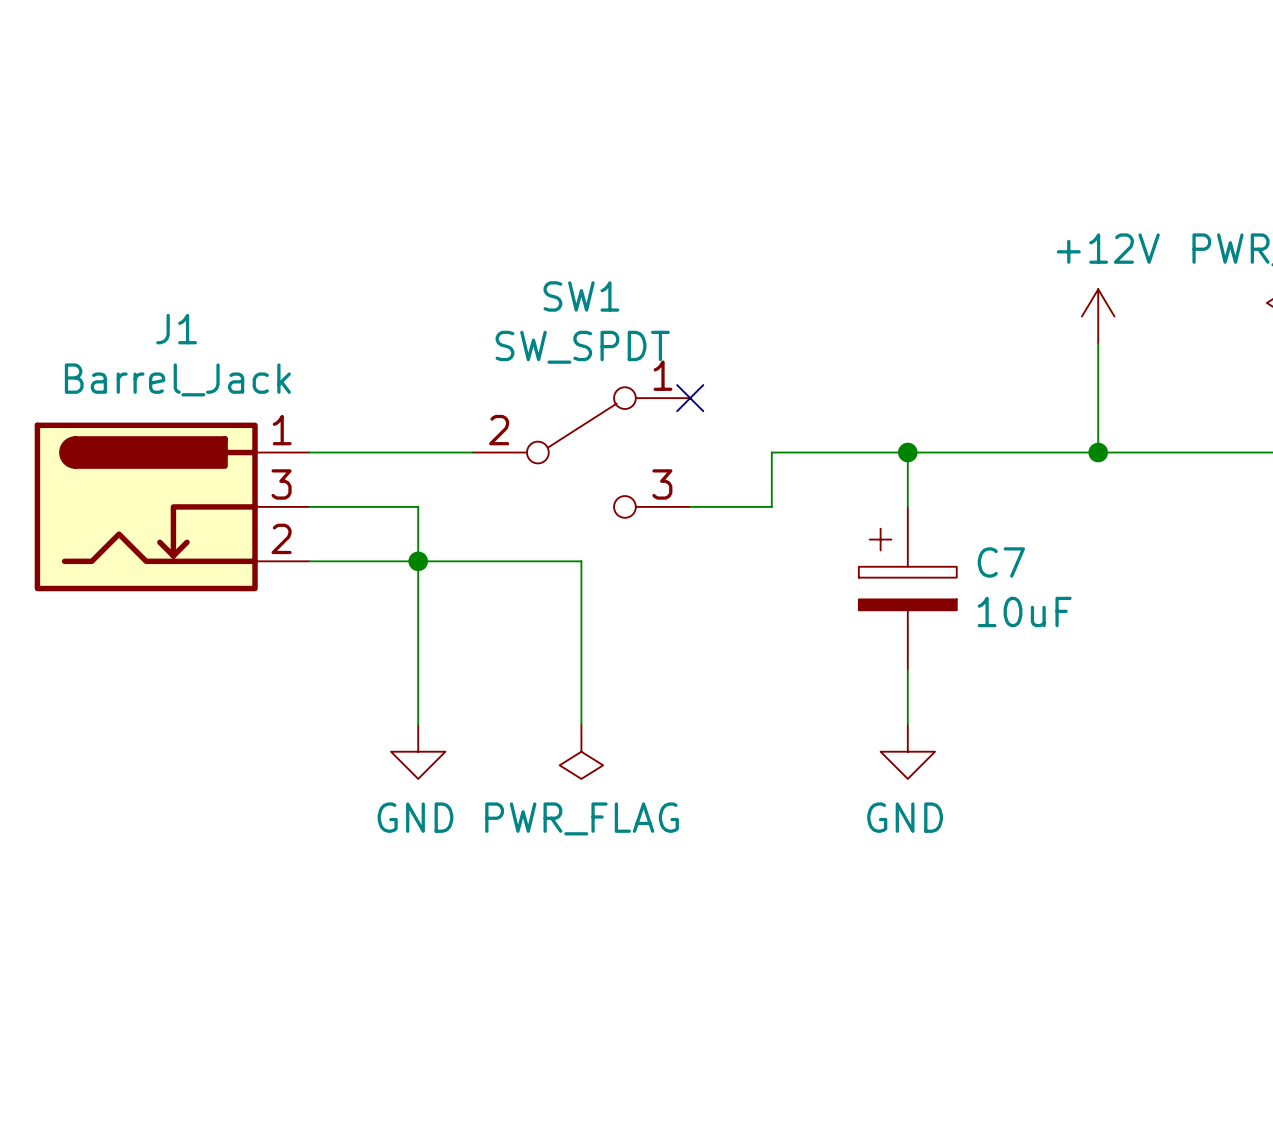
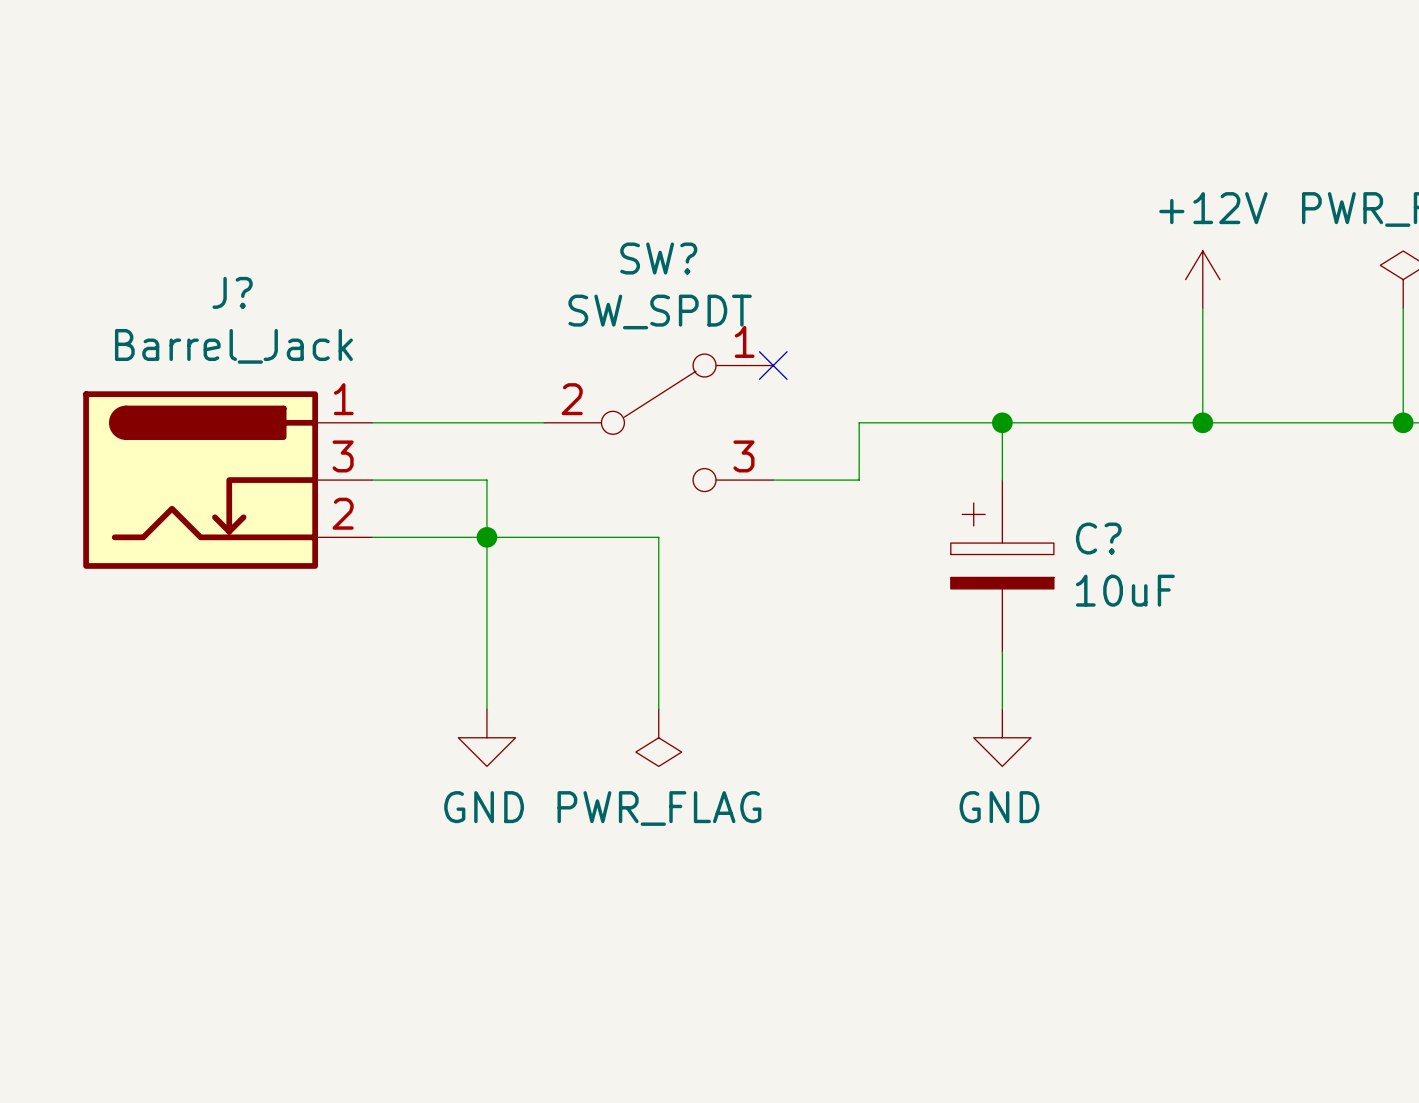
SW1 name: SW1 (581, 296) -> SW? (658, 258)
J1 name: J1 (176, 329) -> J? (232, 292)
C7 name: C7 (1001, 562) -> C? (1098, 538)

